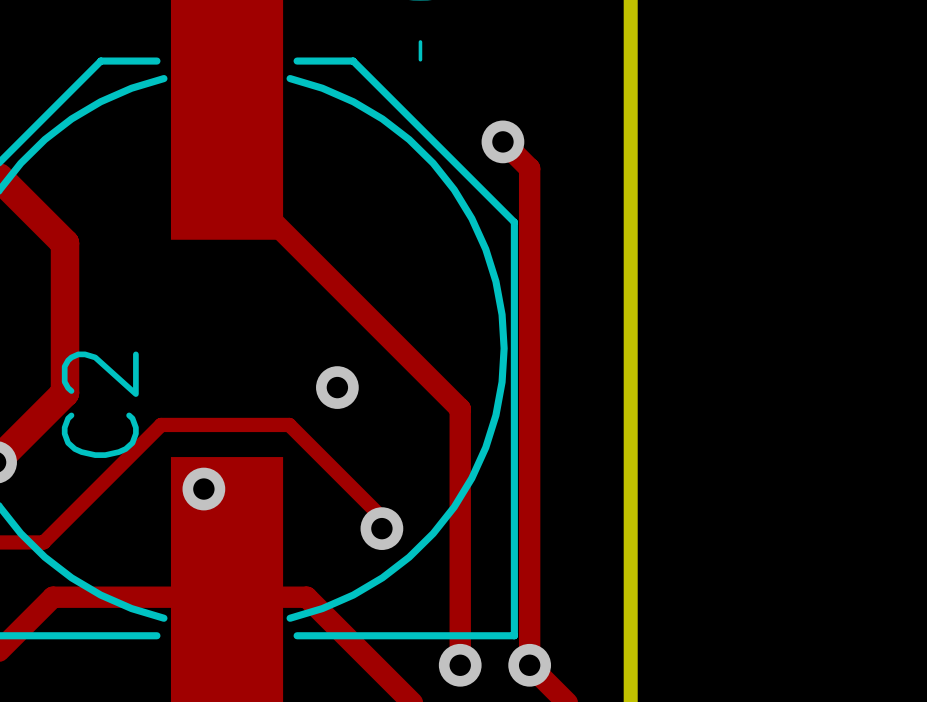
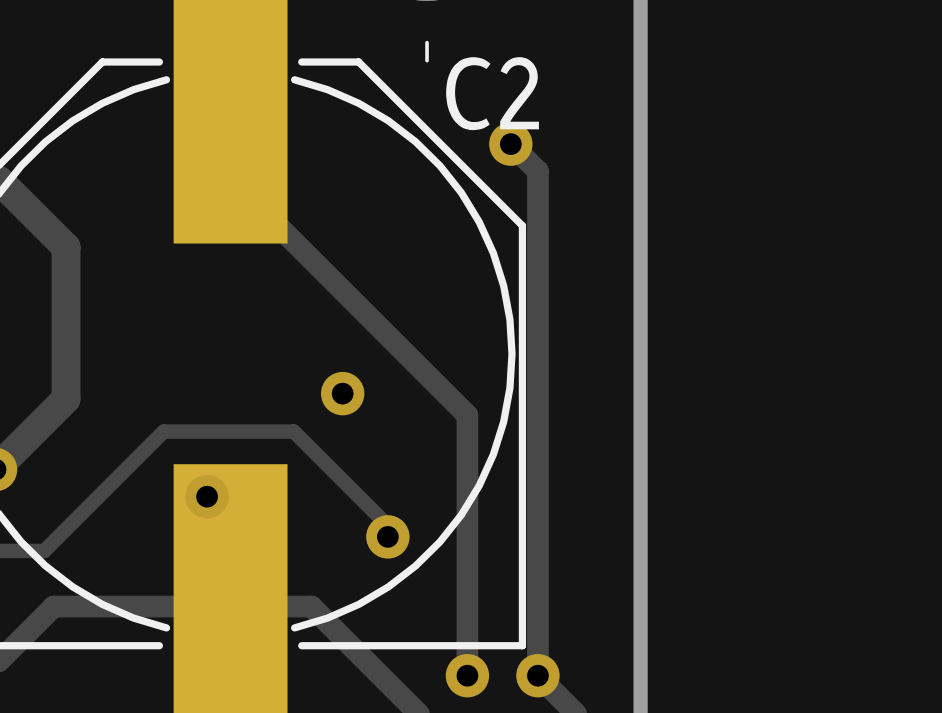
C2 name rotation: 0° (100, 404) -> 90° clockwise (492, 93)
C2 name position: C2 (100, 404) -> C2 (492, 93)

